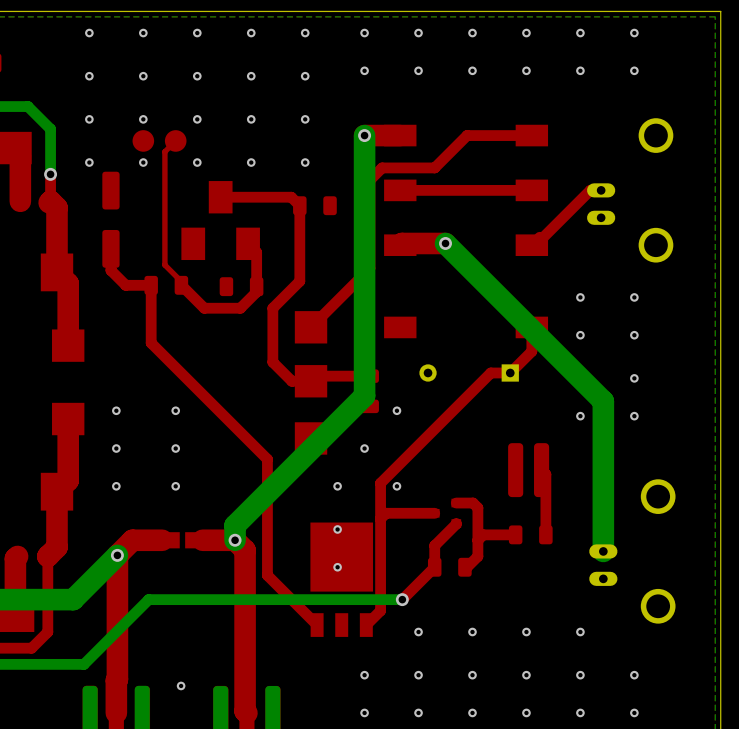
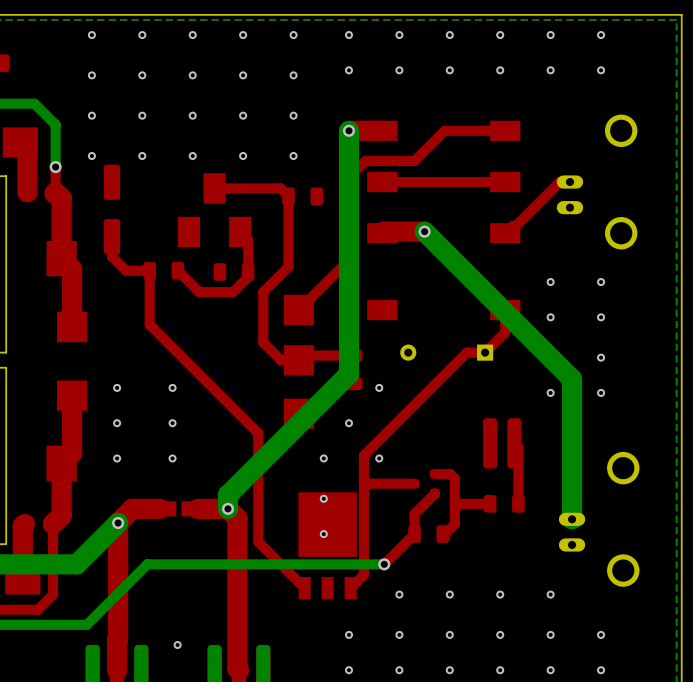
part: (159, 140) -> none
top track: (175, 140) (164, 151) (164, 265) (181, 281) (181, 285) -> none

